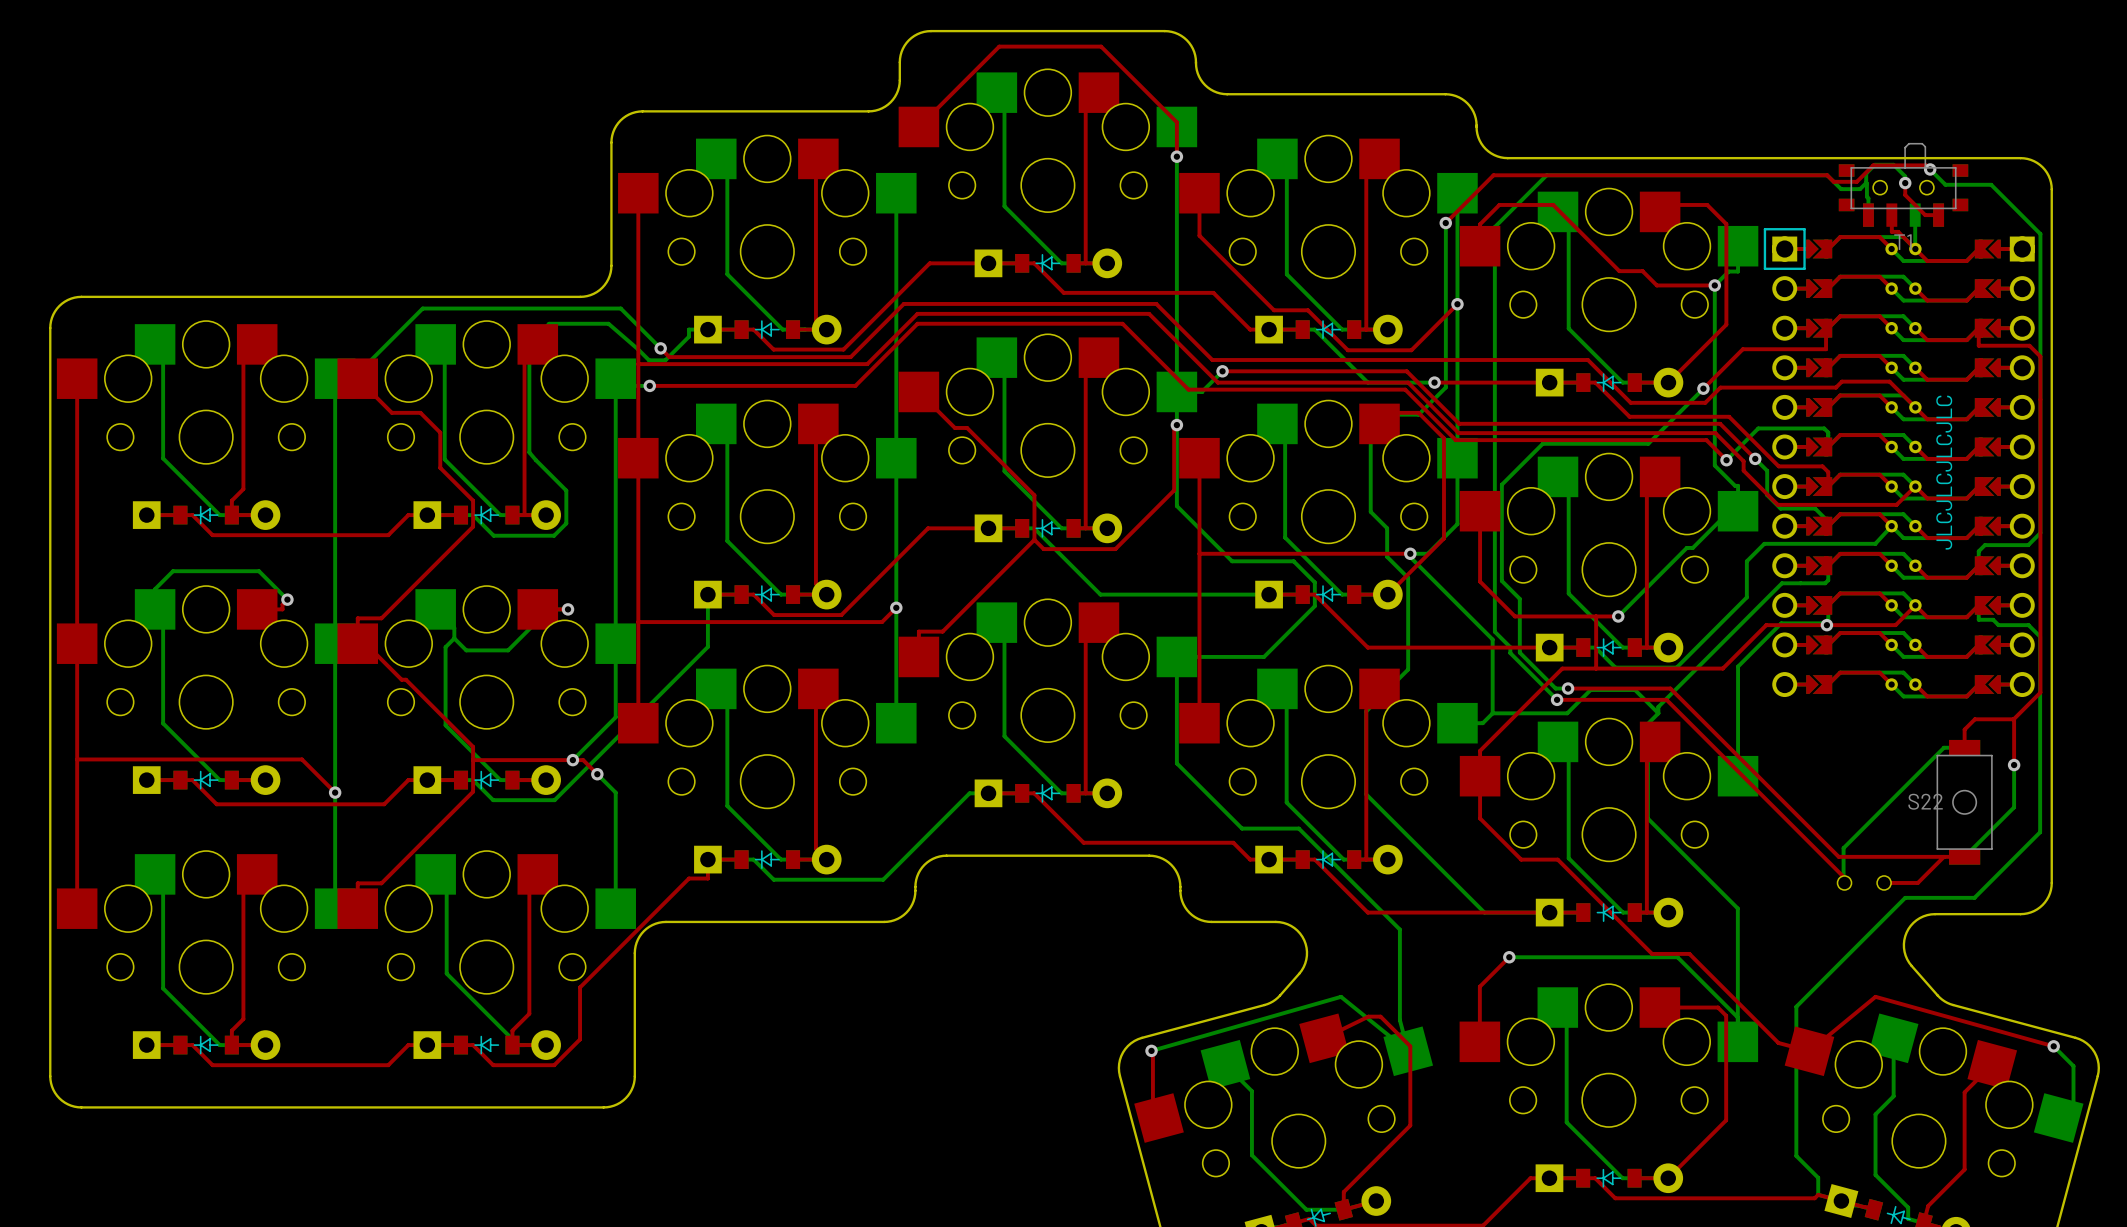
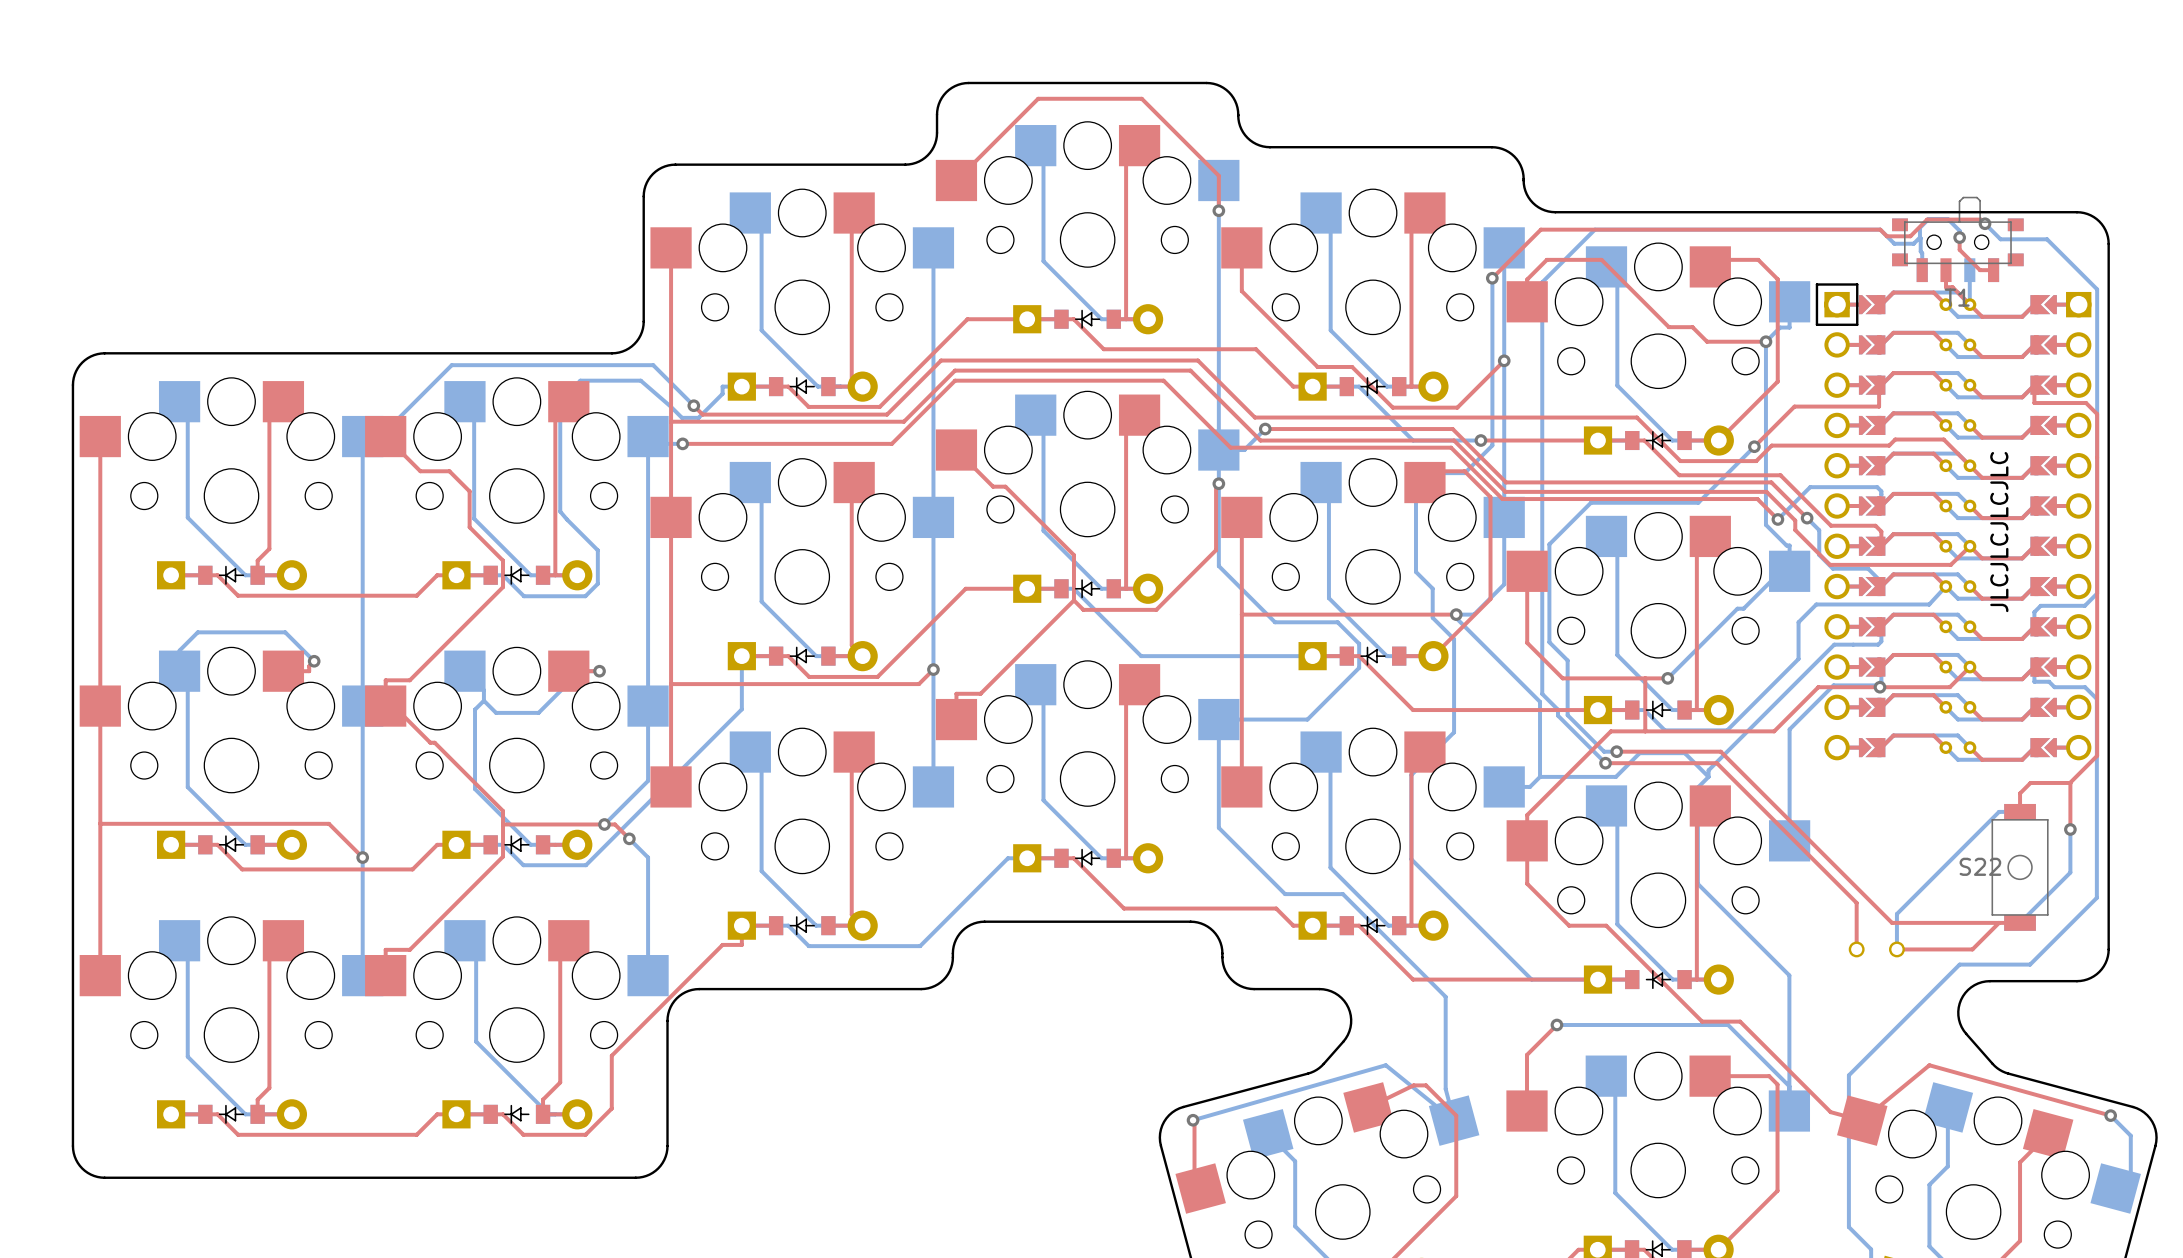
top track: (1803, 837) (1844, 877) (1844, 882) -> (1856, 902) (1856, 949)
part: none -> (1876, 949)
top track: none -> (1896, 949) (1938, 949)
part: (1864, 882) -> none

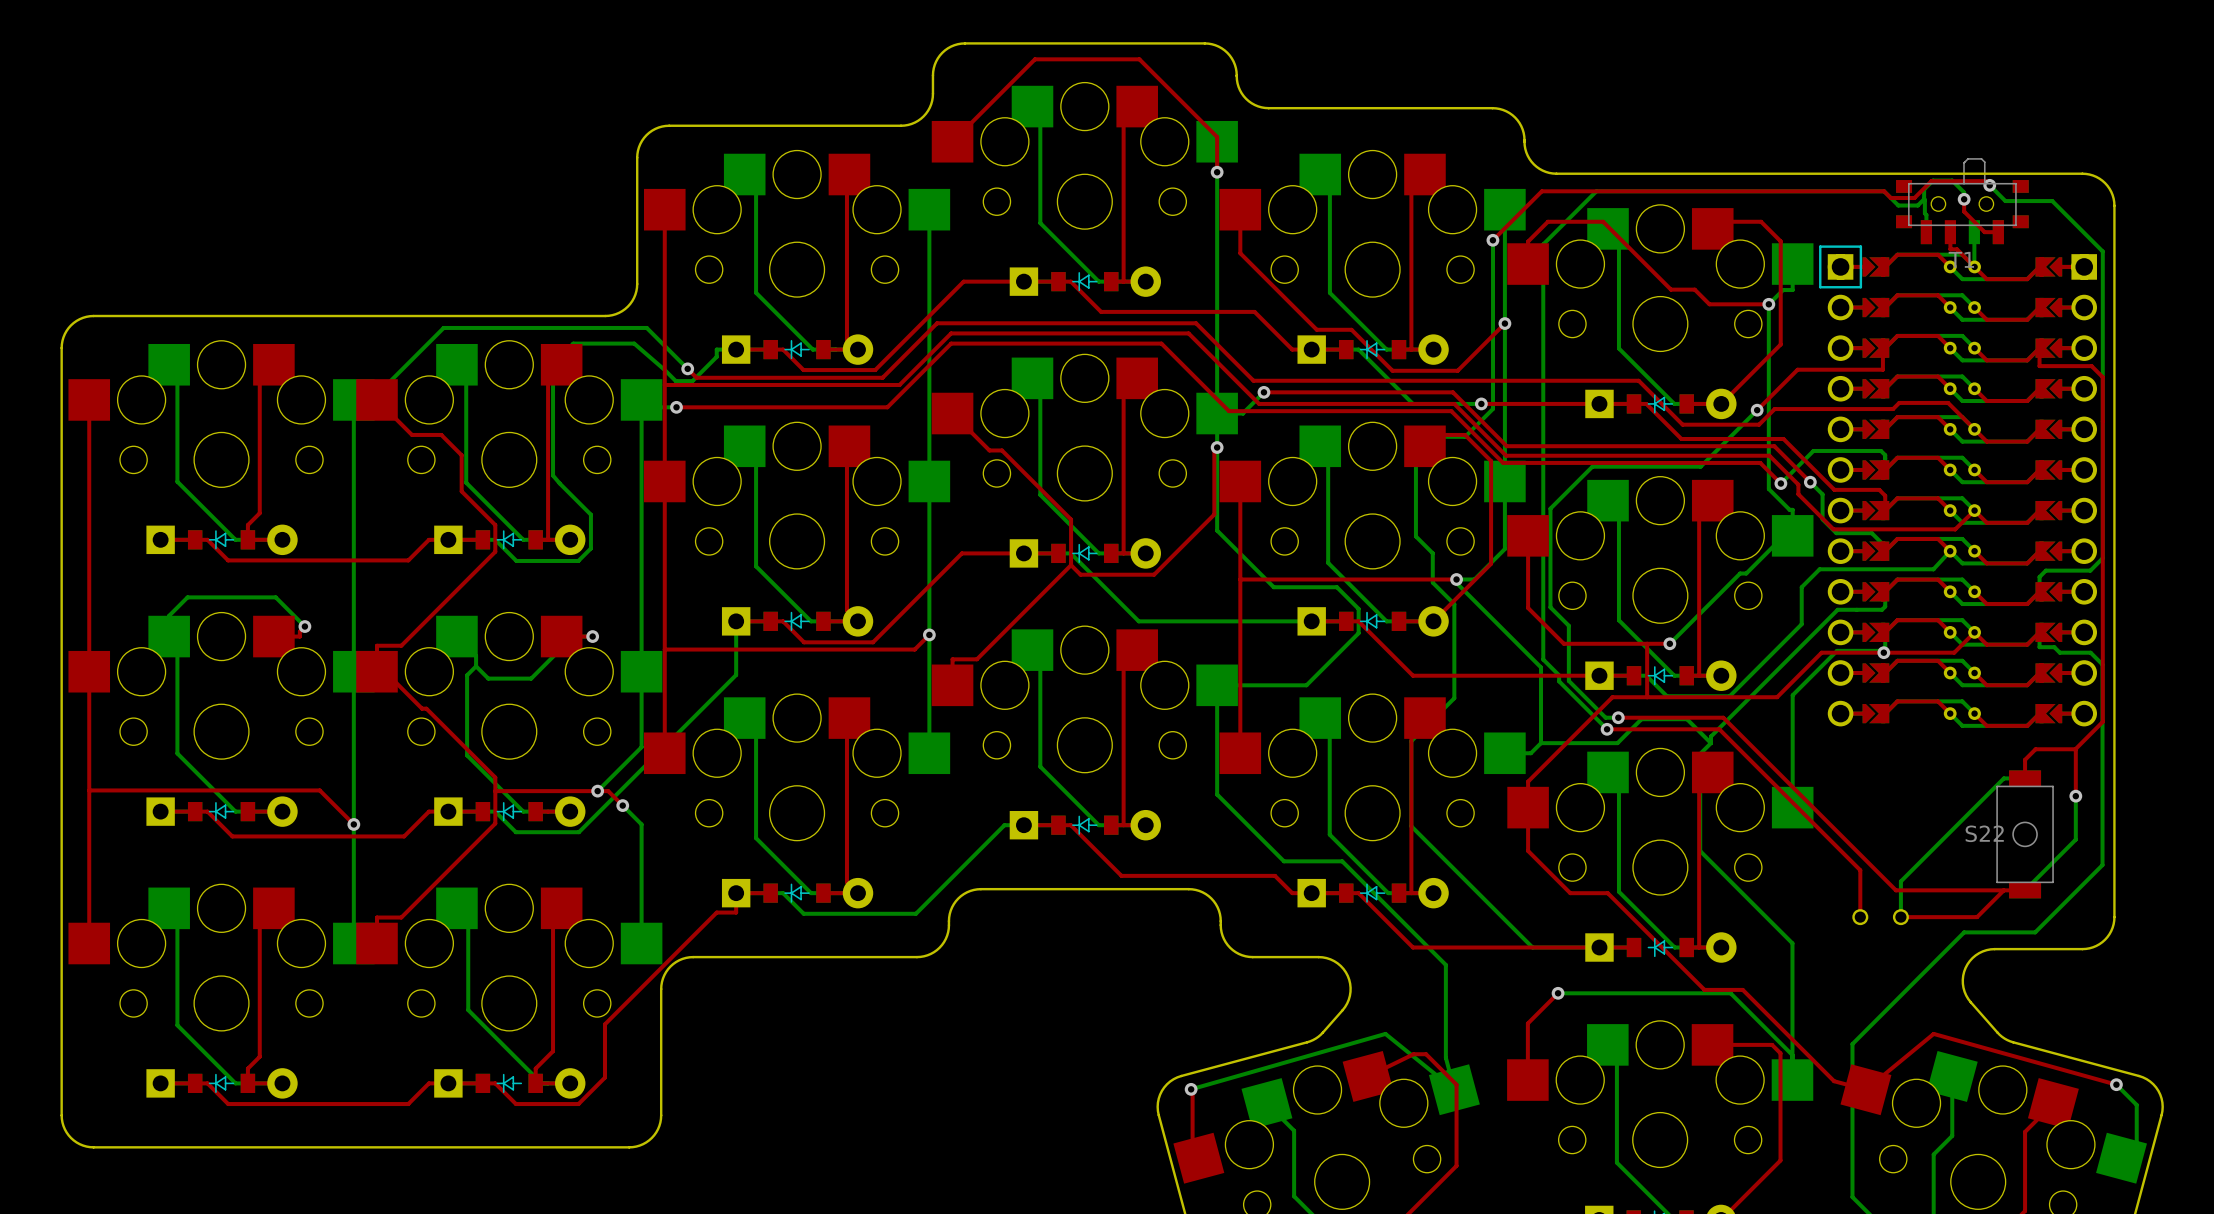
text: JLCJLCJLCJLC (1999, 532) -> none

